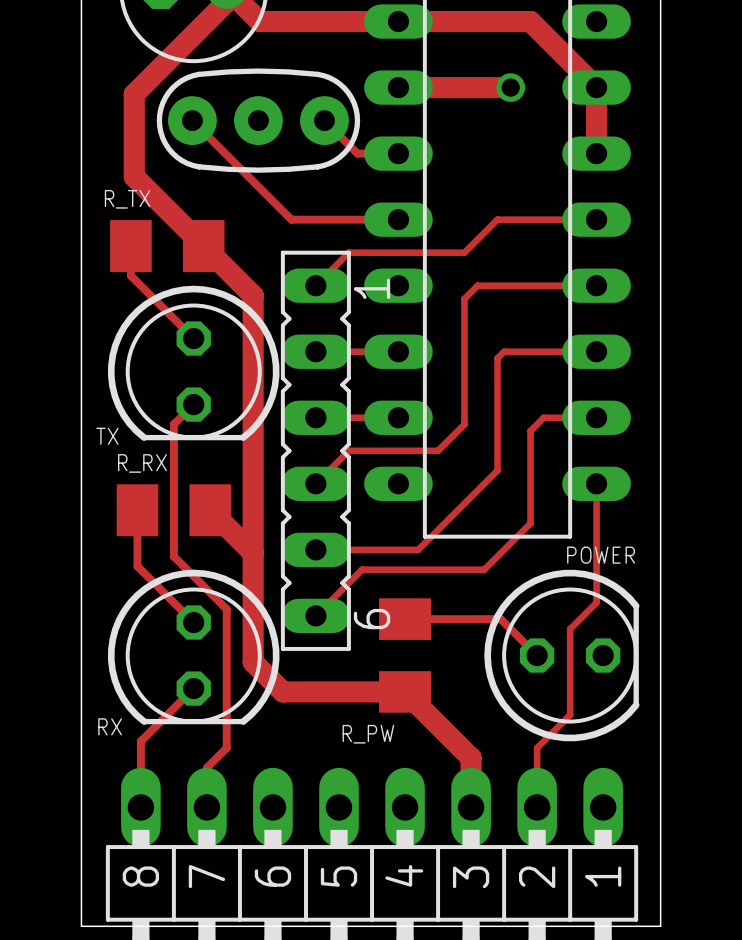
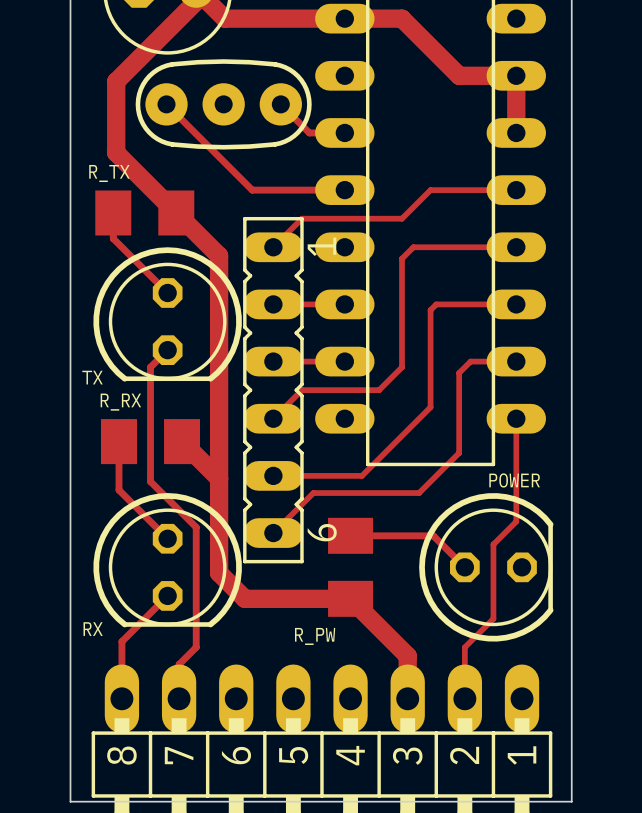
track: (464, 21) (530, 21) (596, 87) -> (401, 18) (459, 75) (516, 75)
track: (398, 87) (510, 87) -> none
via: (510, 87) -> none

